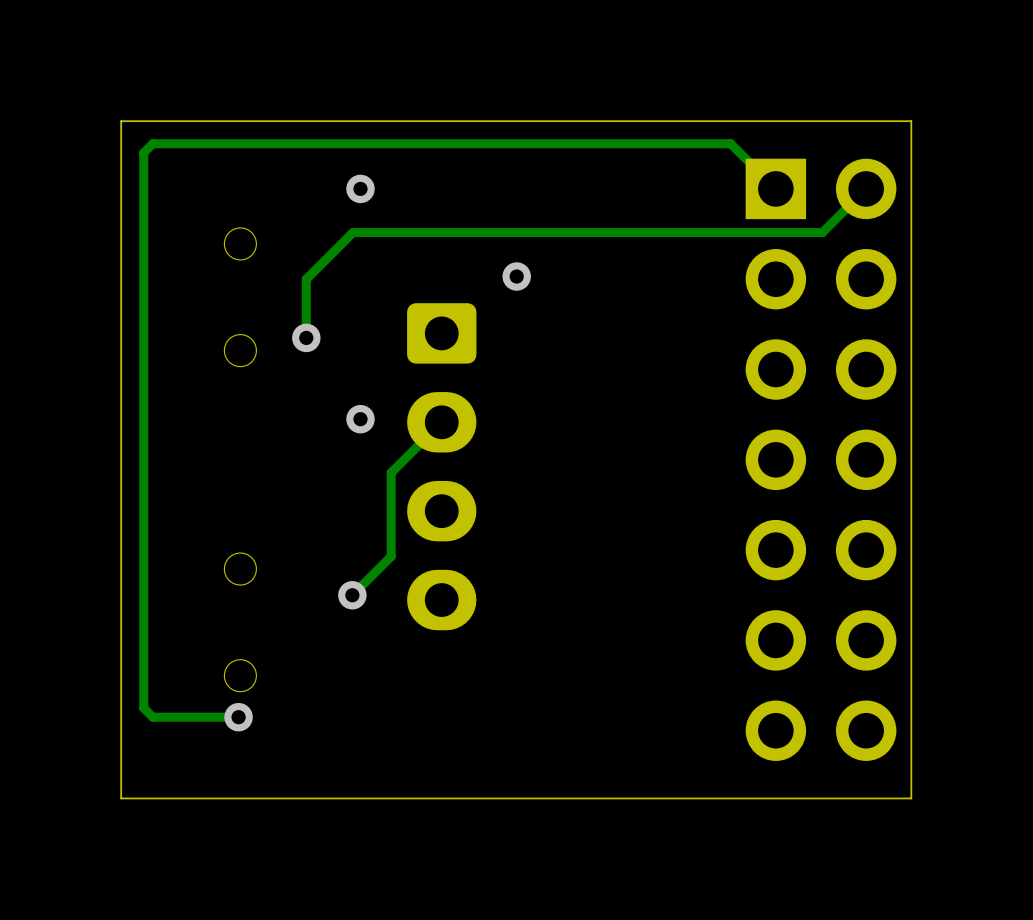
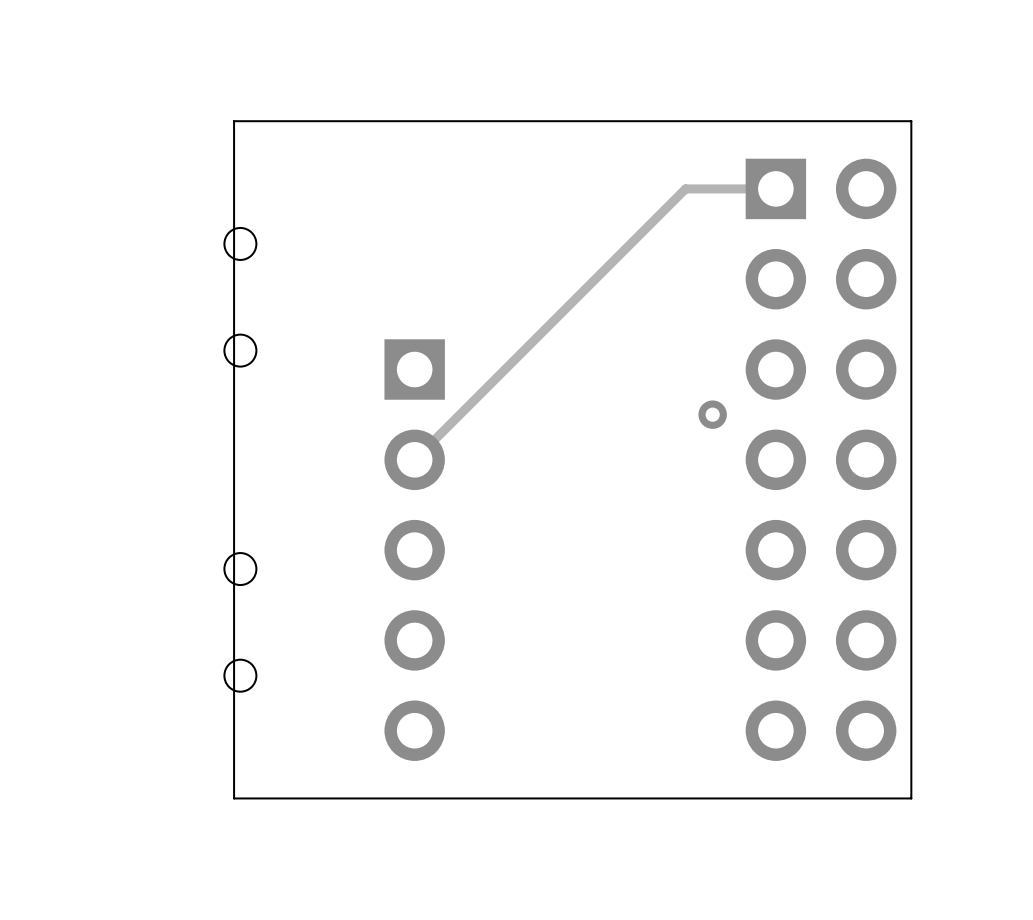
board edge: (234, 121) (121, 121) (121, 798) (234, 798) -> (234, 121) (234, 798)
via: (360, 188) -> none
track: (775, 188) (730, 143) (152, 143) (143, 152) (143, 708) (152, 717) (238, 717) -> (775, 188) (685, 188) (414, 459)
track: (866, 188) (822, 232) (352, 232) (306, 279) (306, 337) -> none
via: (516, 276) -> none
via: (306, 337) -> none
via: none -> (712, 414)
via: (360, 419) -> none
track: (441, 422) (391, 472) (391, 556) (352, 595) -> none
part: (441, 466) -> none
part: none -> (414, 550)
via: (352, 595) -> none
via: (238, 717) -> none

